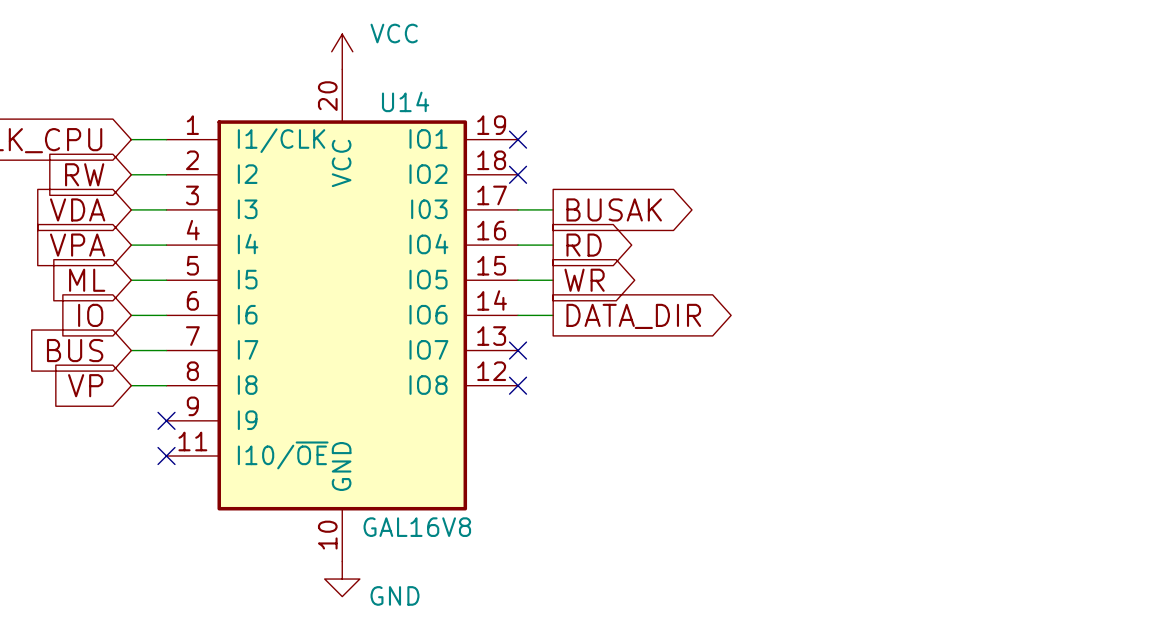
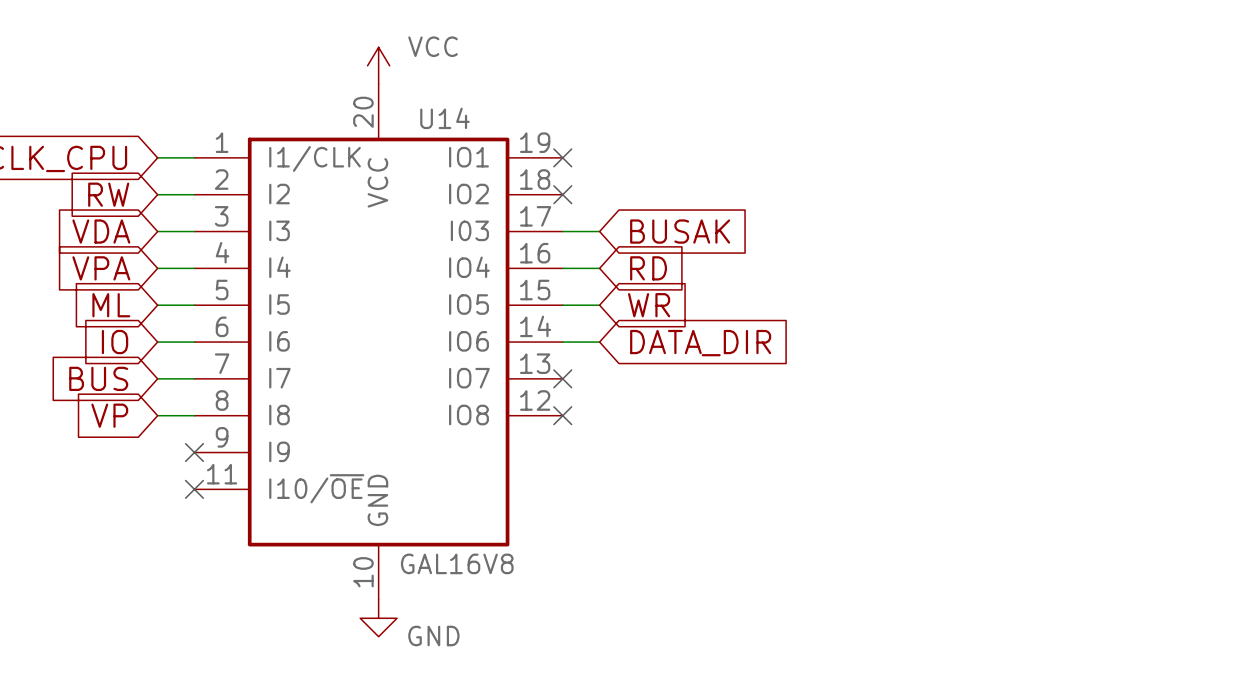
global label shape: output (614, 209) -> input (680, 231)
global label shape: output (584, 245) -> input (648, 268)
global label shape: output (584, 280) -> input (649, 305)
global label shape: output (633, 316) -> input (700, 343)

